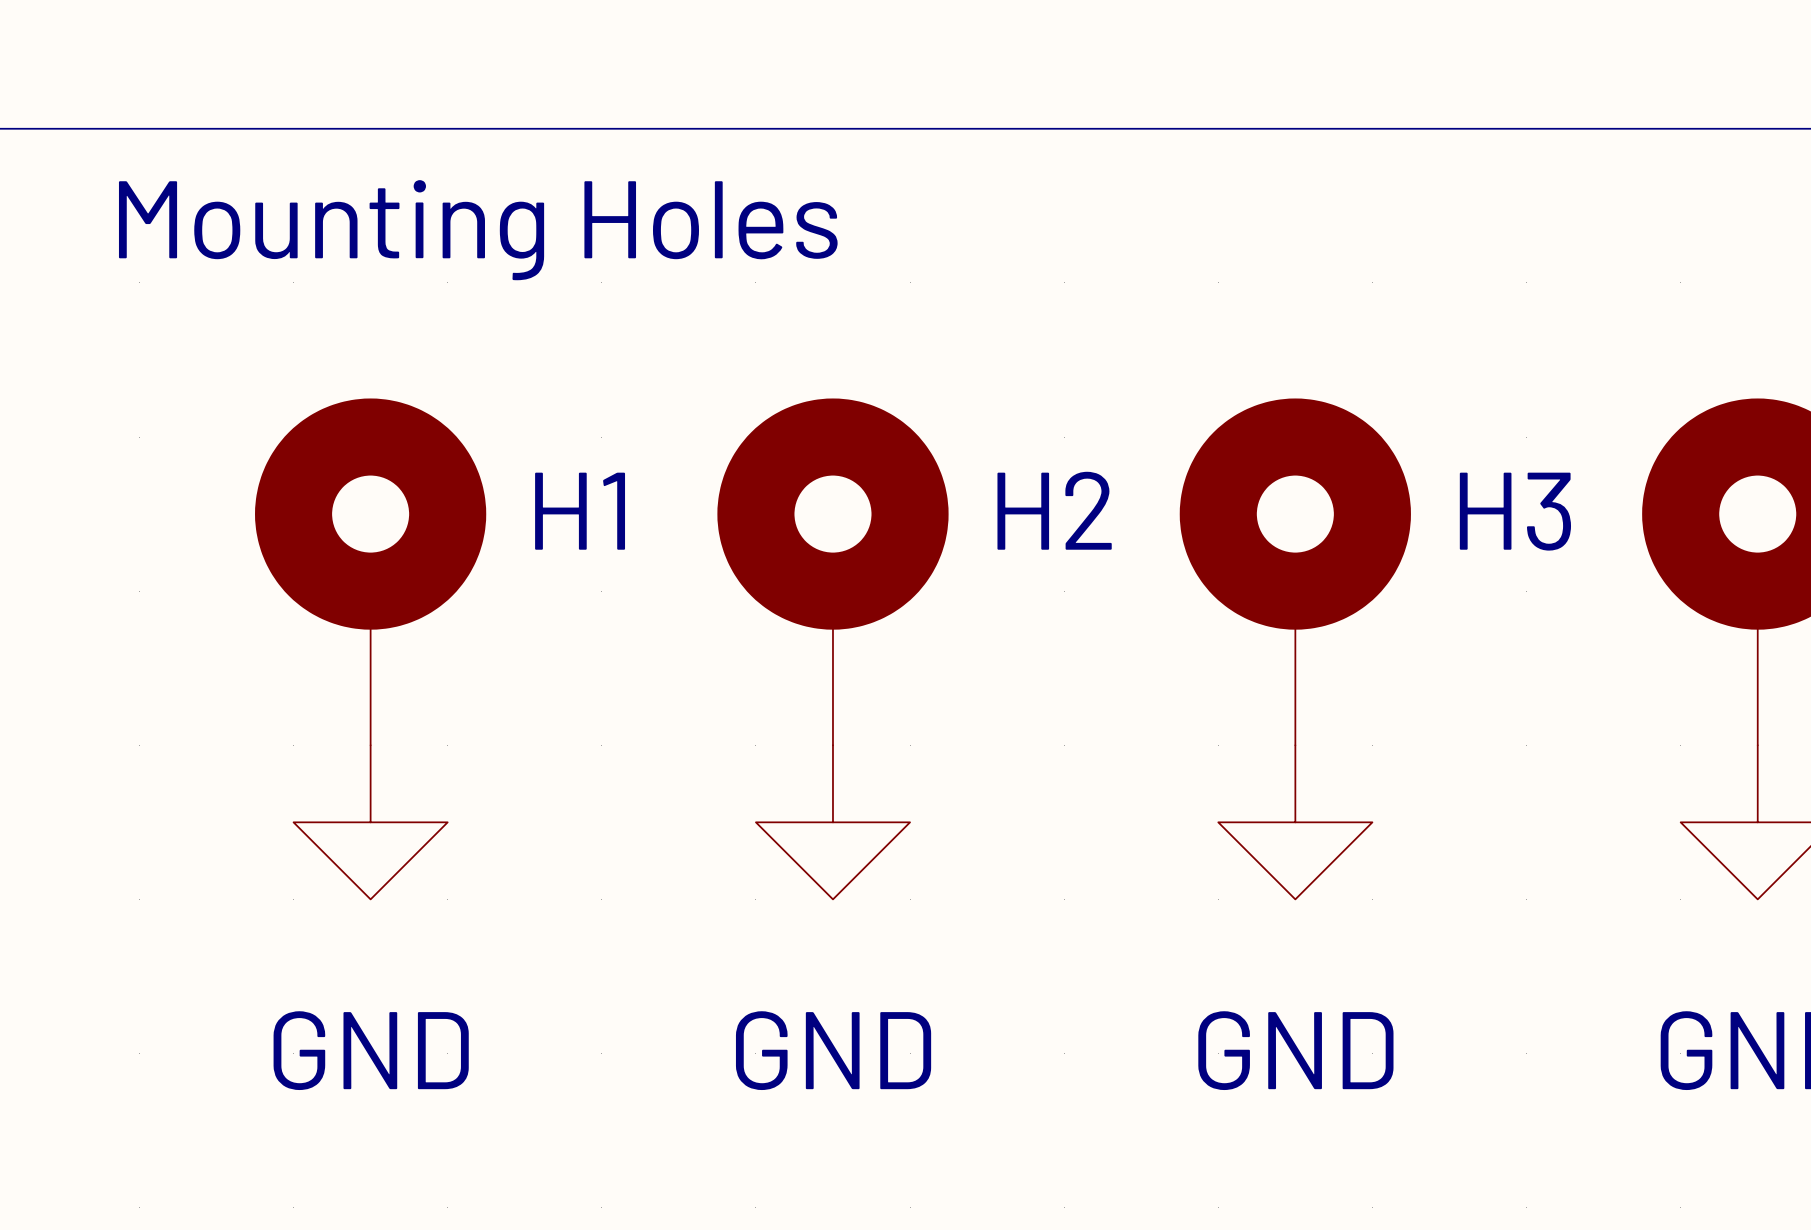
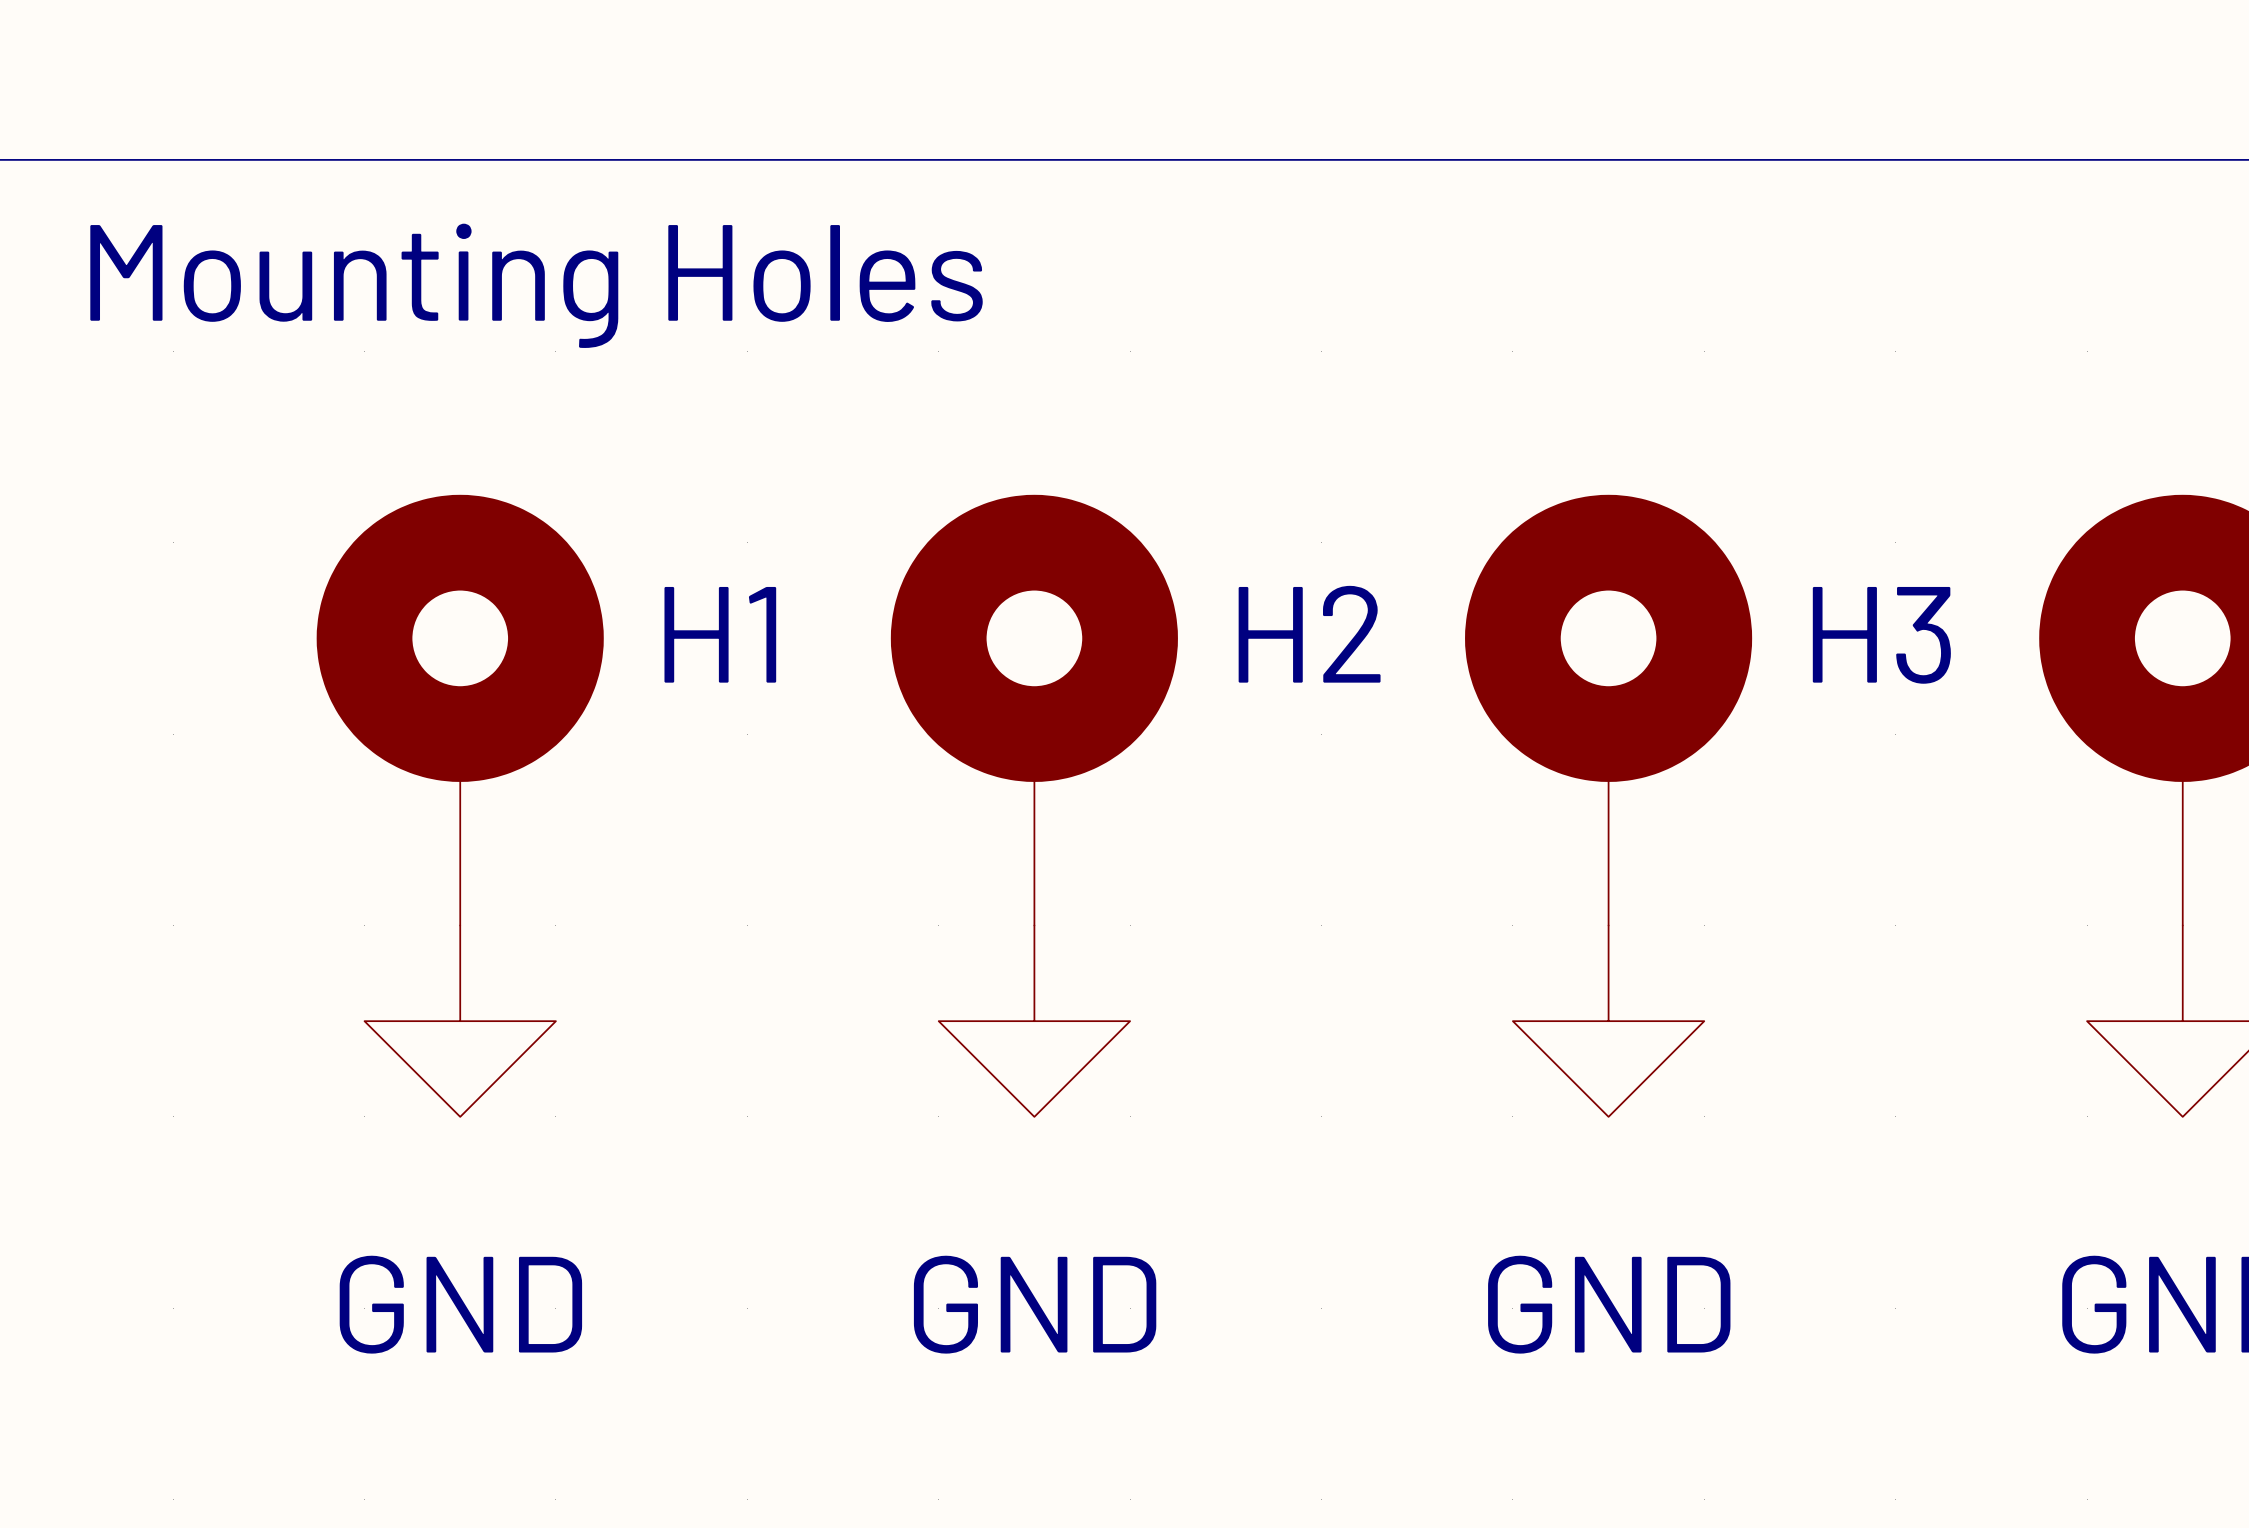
text position: Mounting Holes (478, 230) -> Mounting Holes (536, 285)

